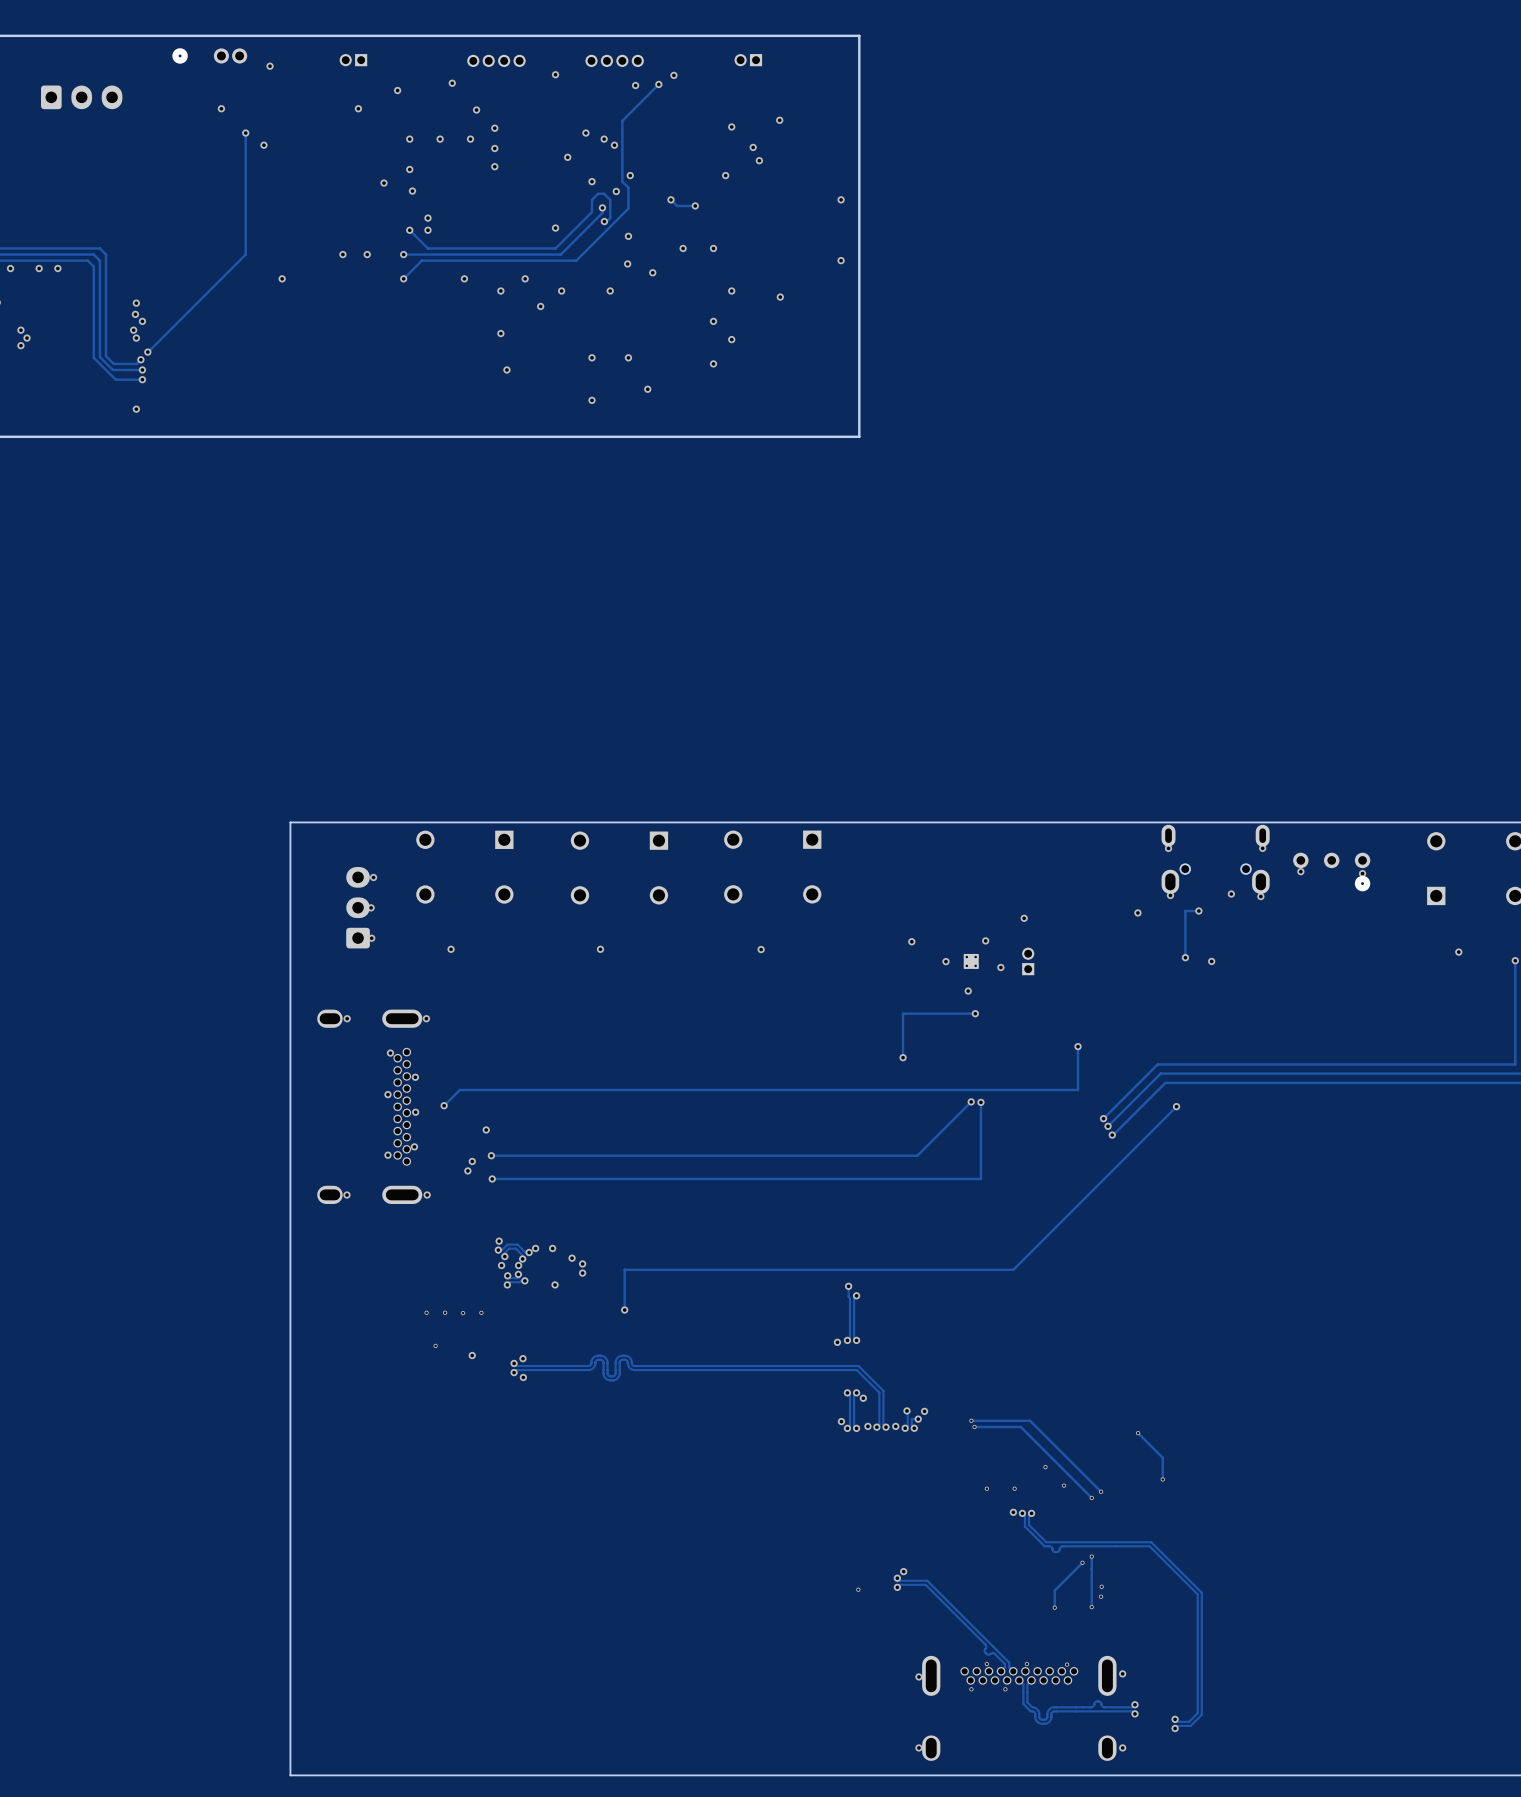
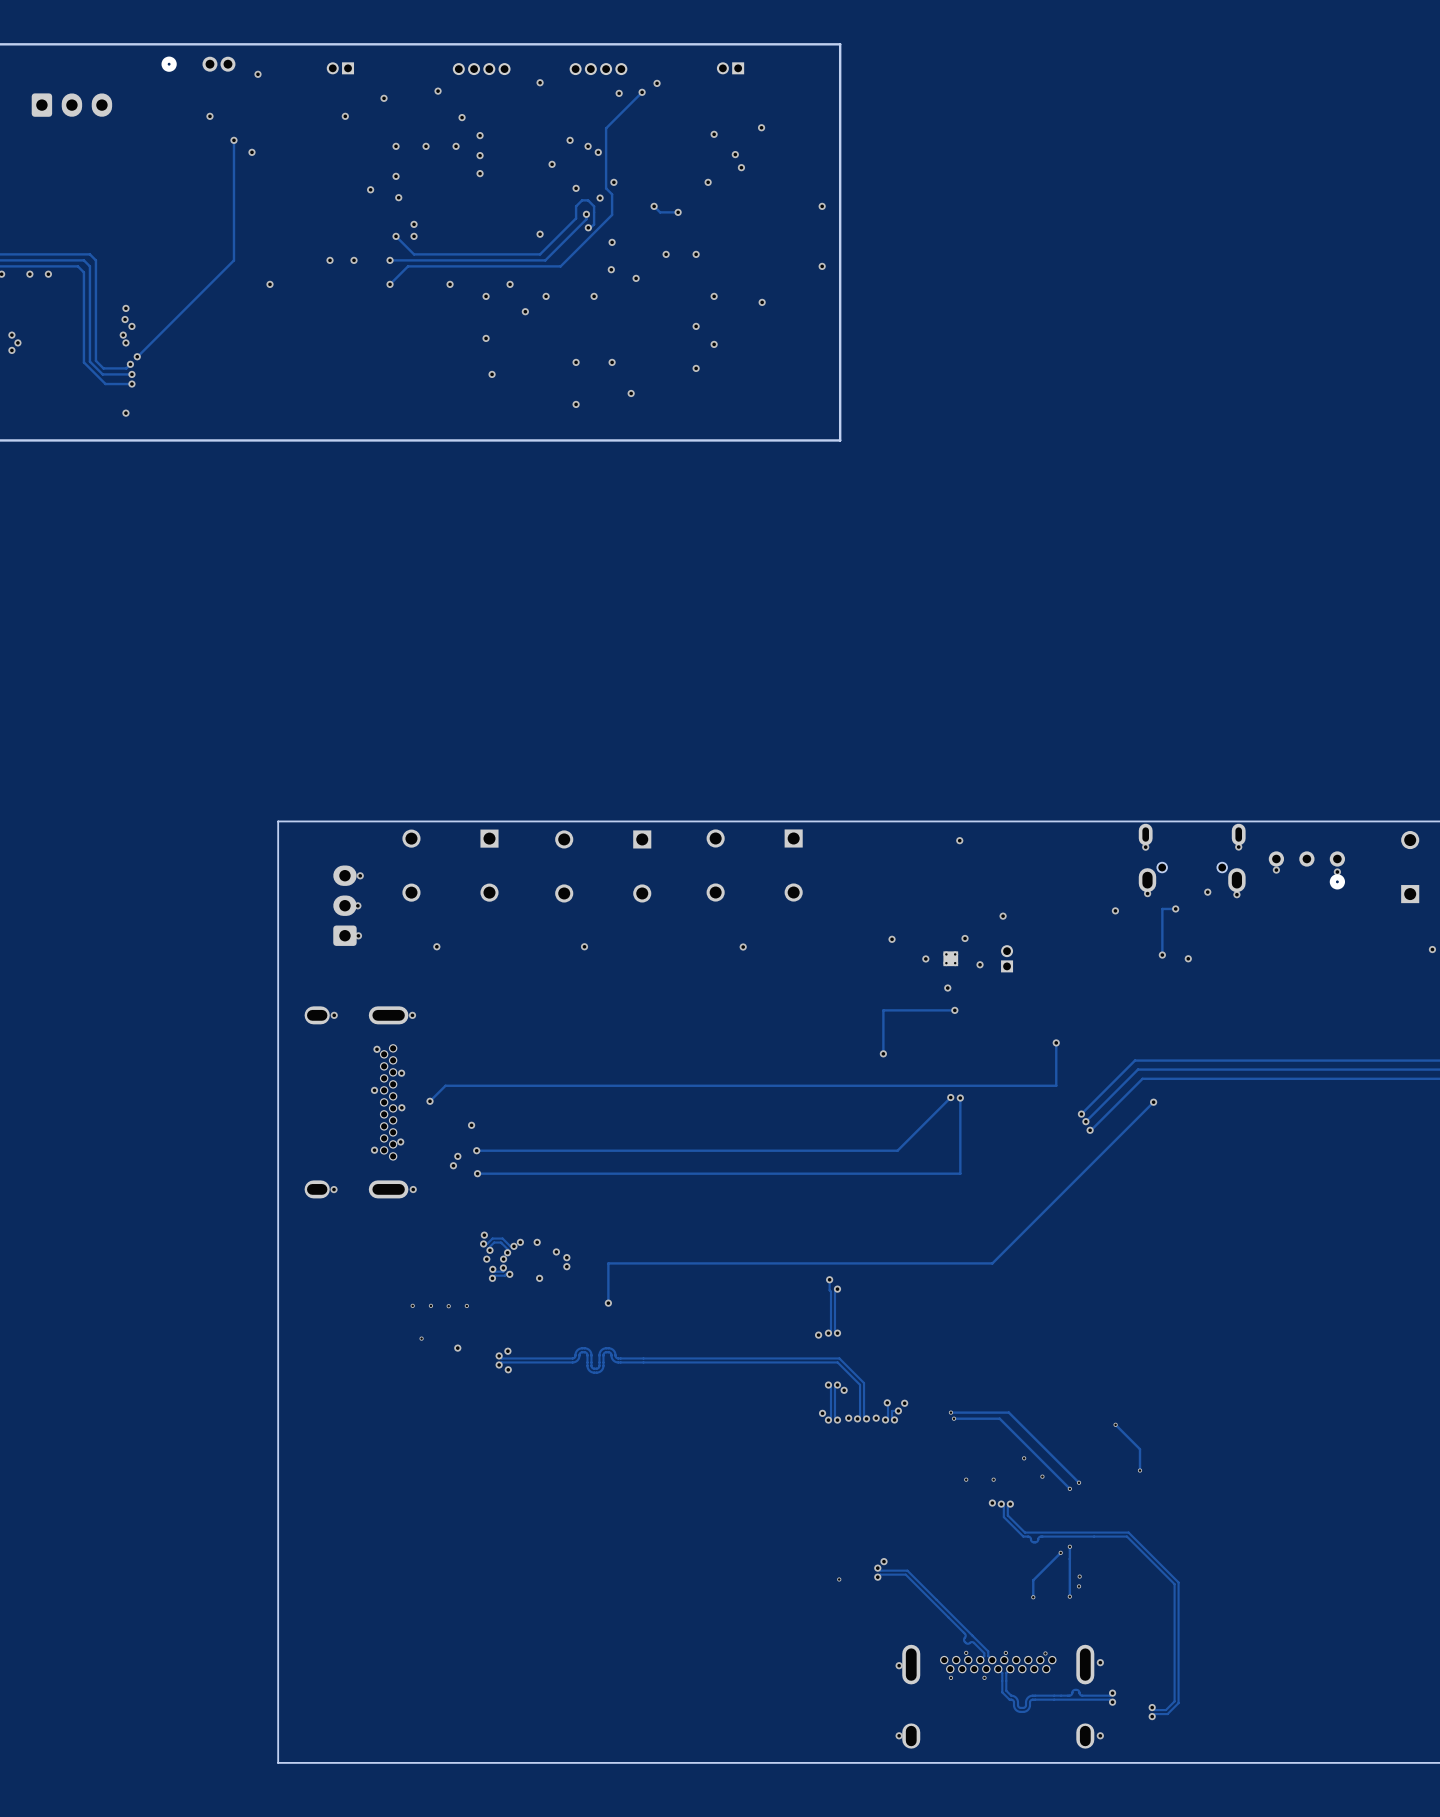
via: none -> (959, 840)

